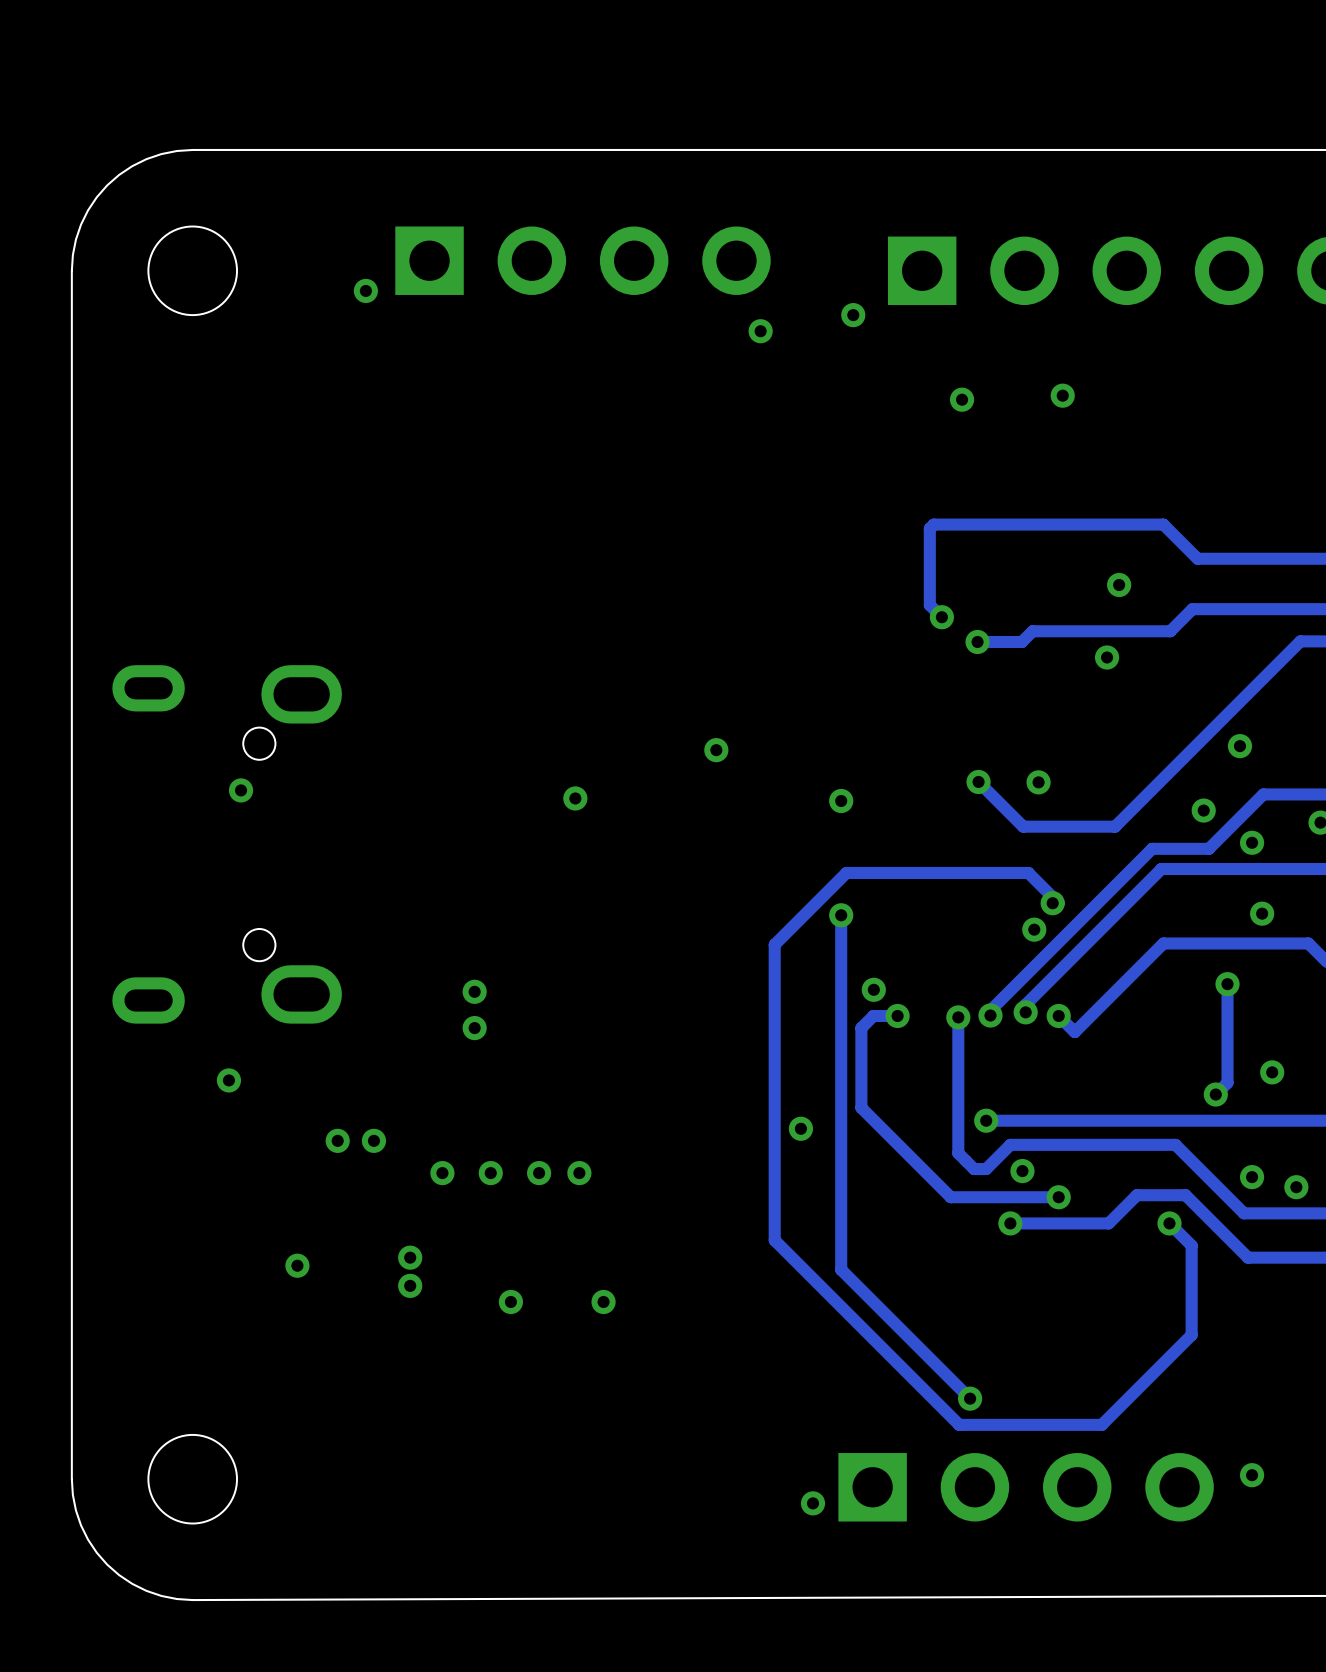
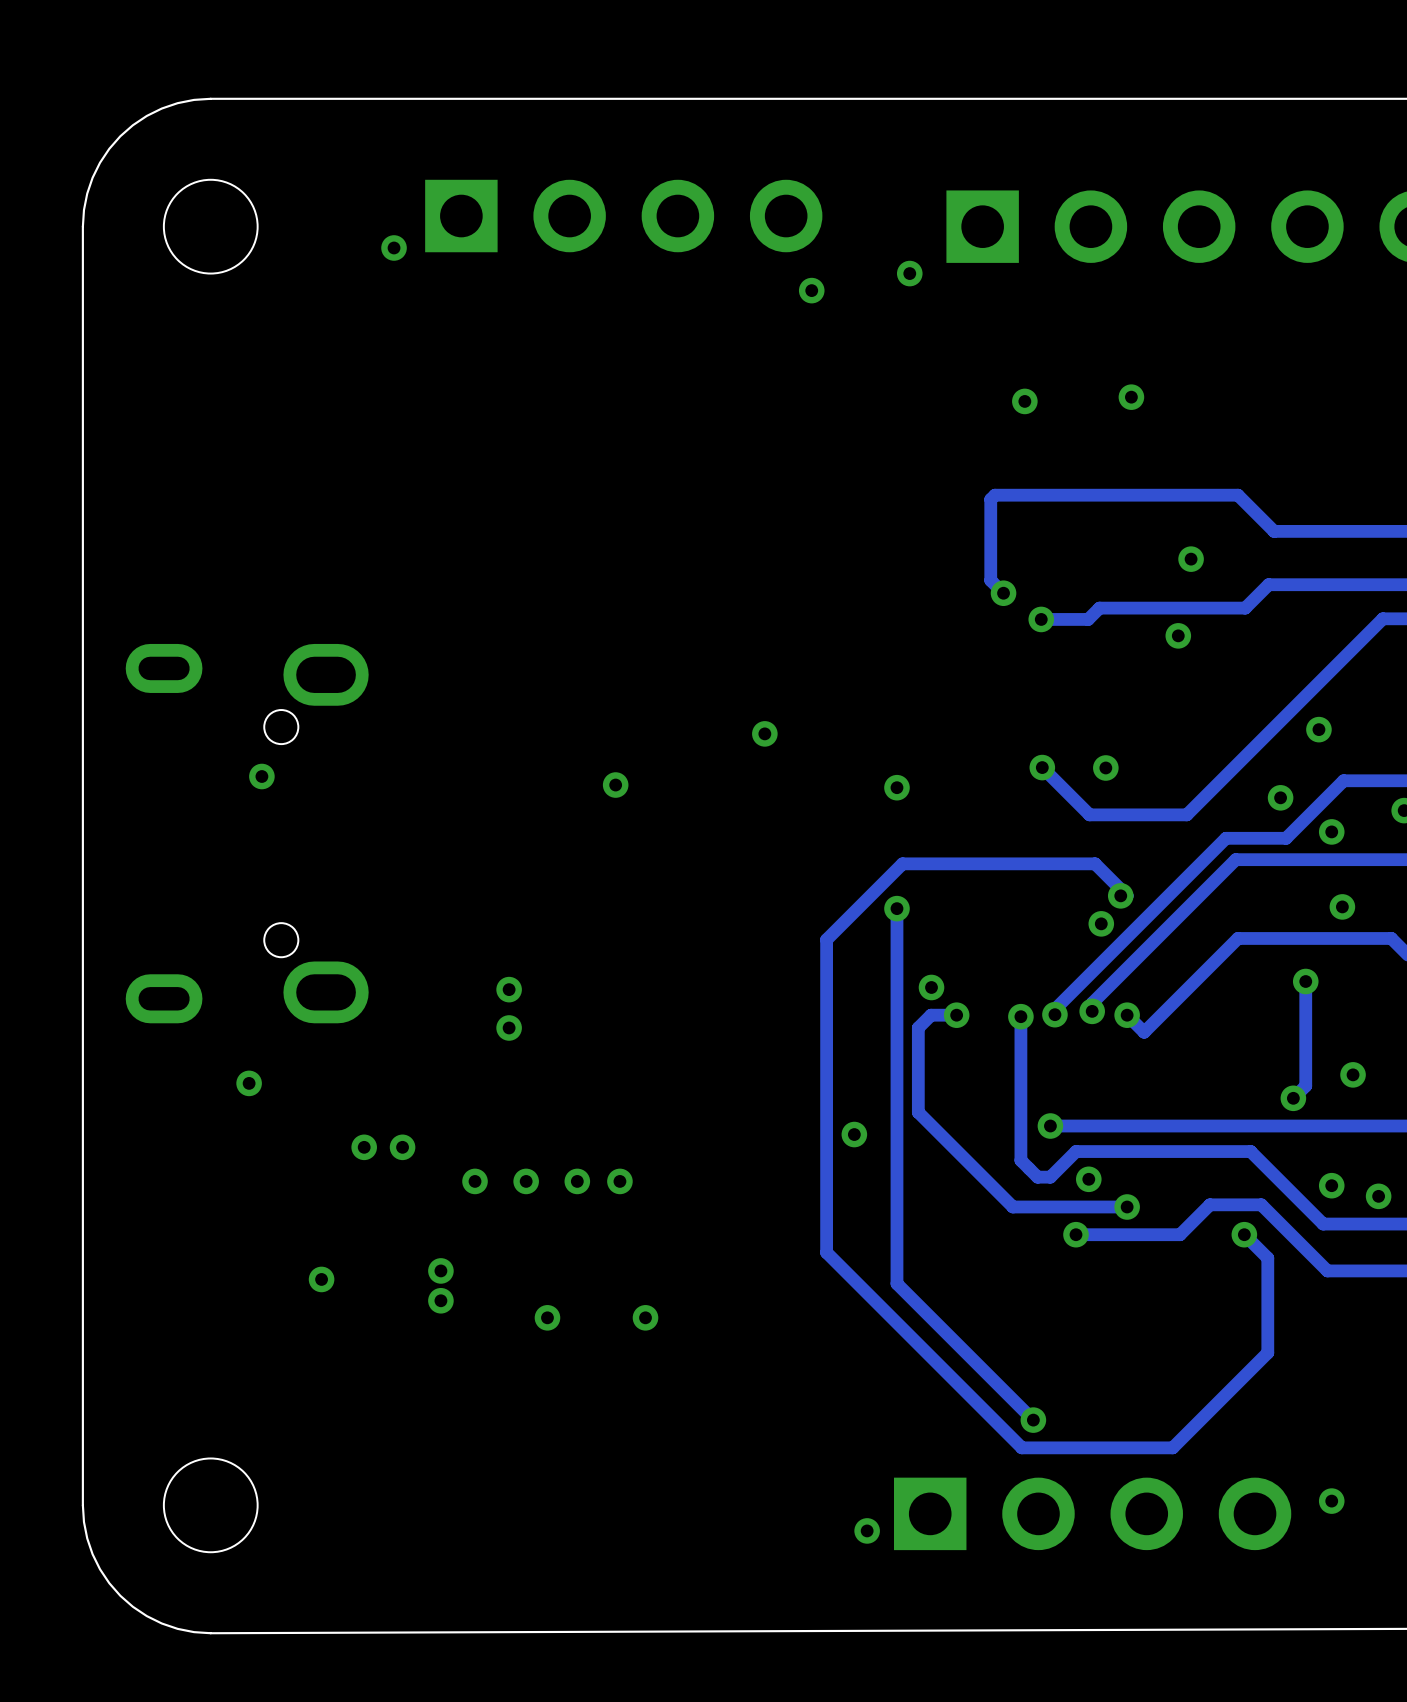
via position: (1062, 395) -> (1131, 397)
via position: (962, 399) -> (1024, 401)

